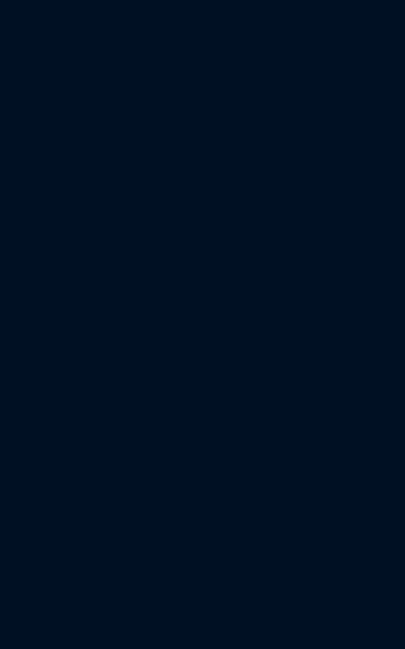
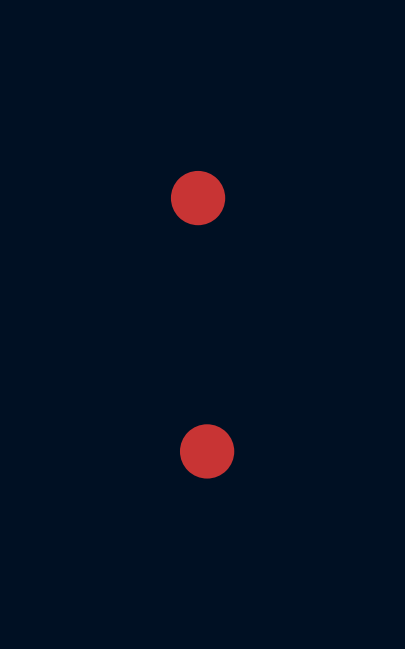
part: none -> (198, 198)
part: none -> (207, 451)

